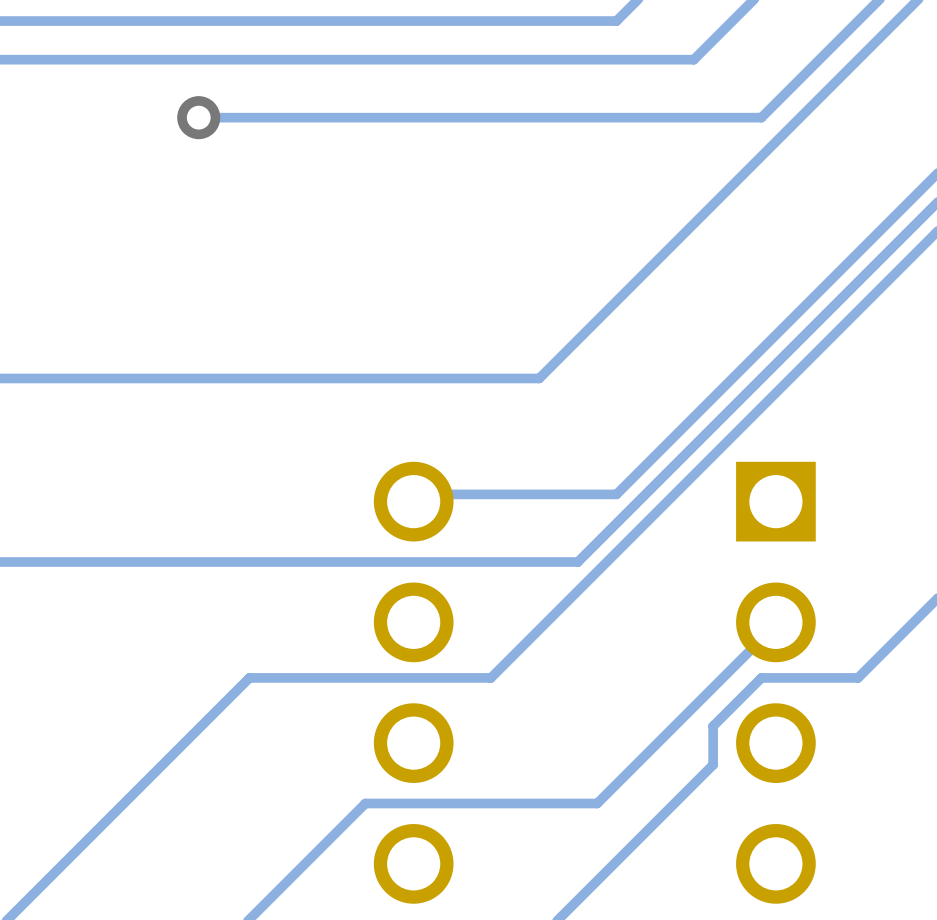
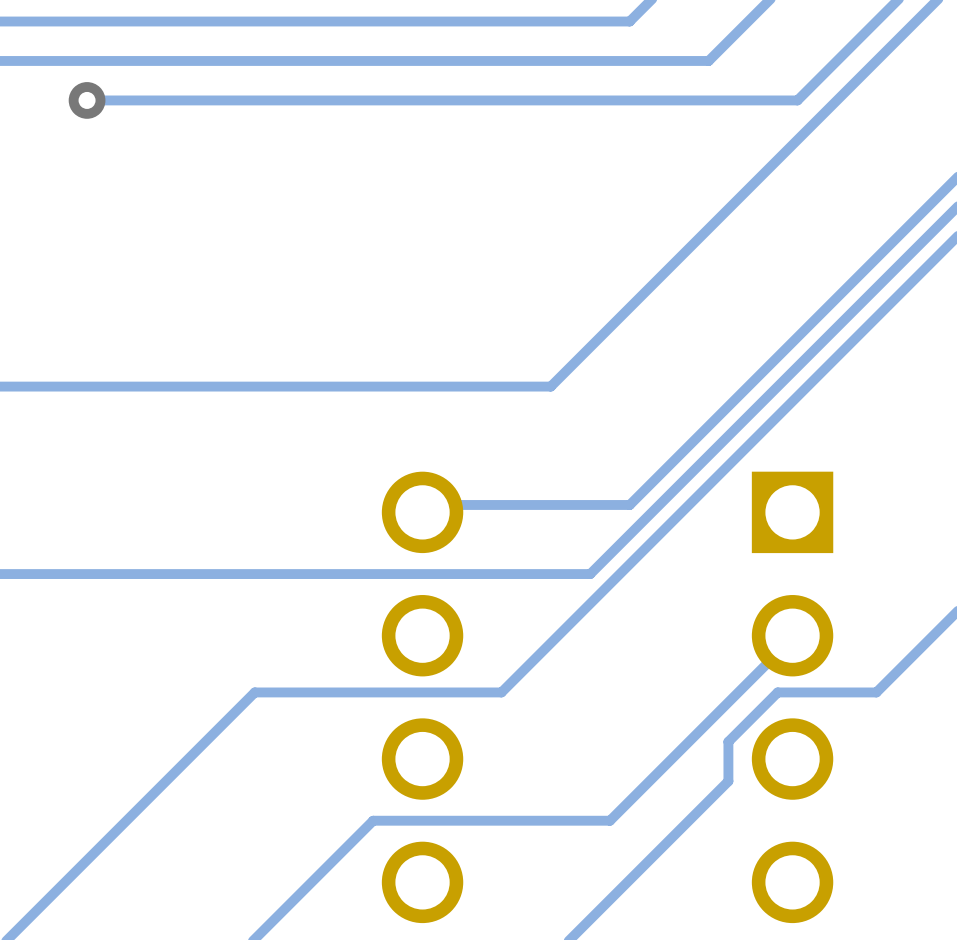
via: none -> (87, 100)
track: (780, 98) (761, 117) (198, 117) -> (797, 100) (87, 100)
via: (198, 117) -> none

